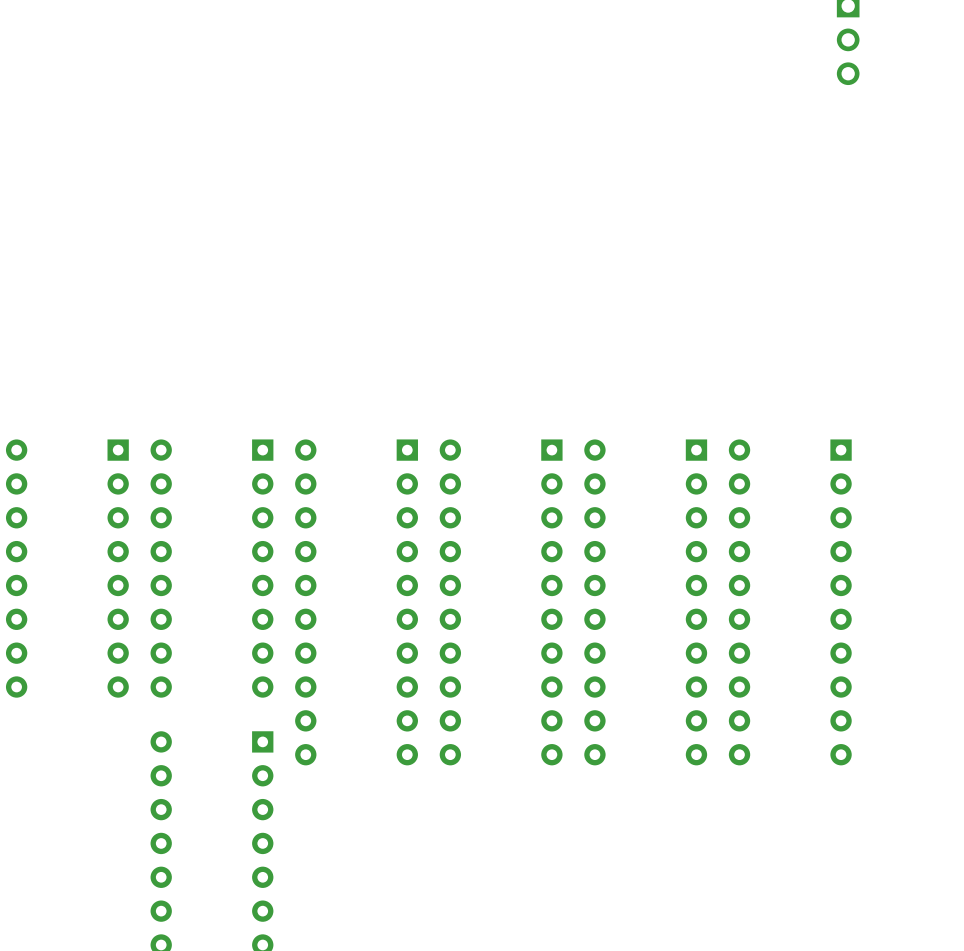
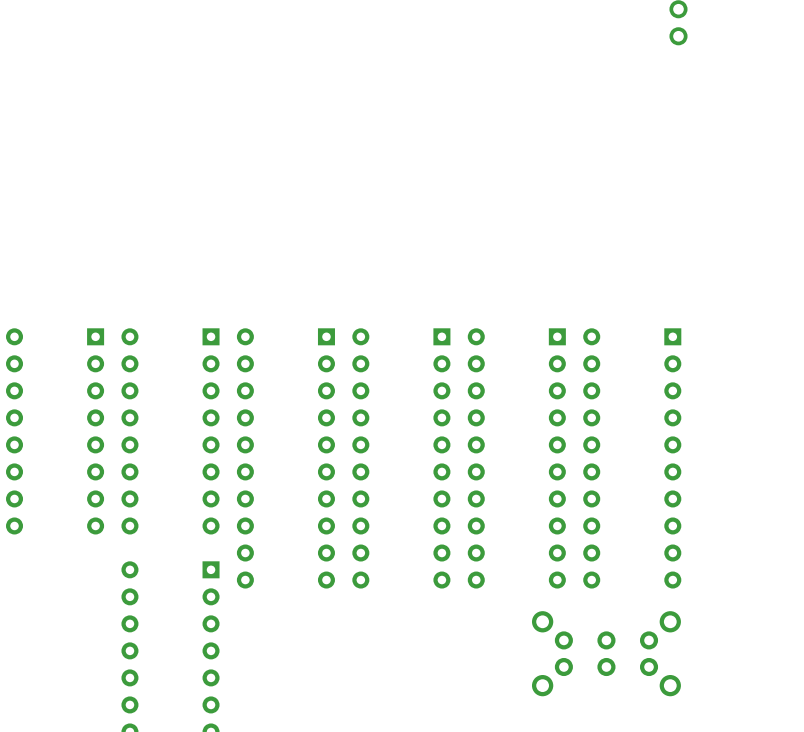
part: none -> (606, 653)

